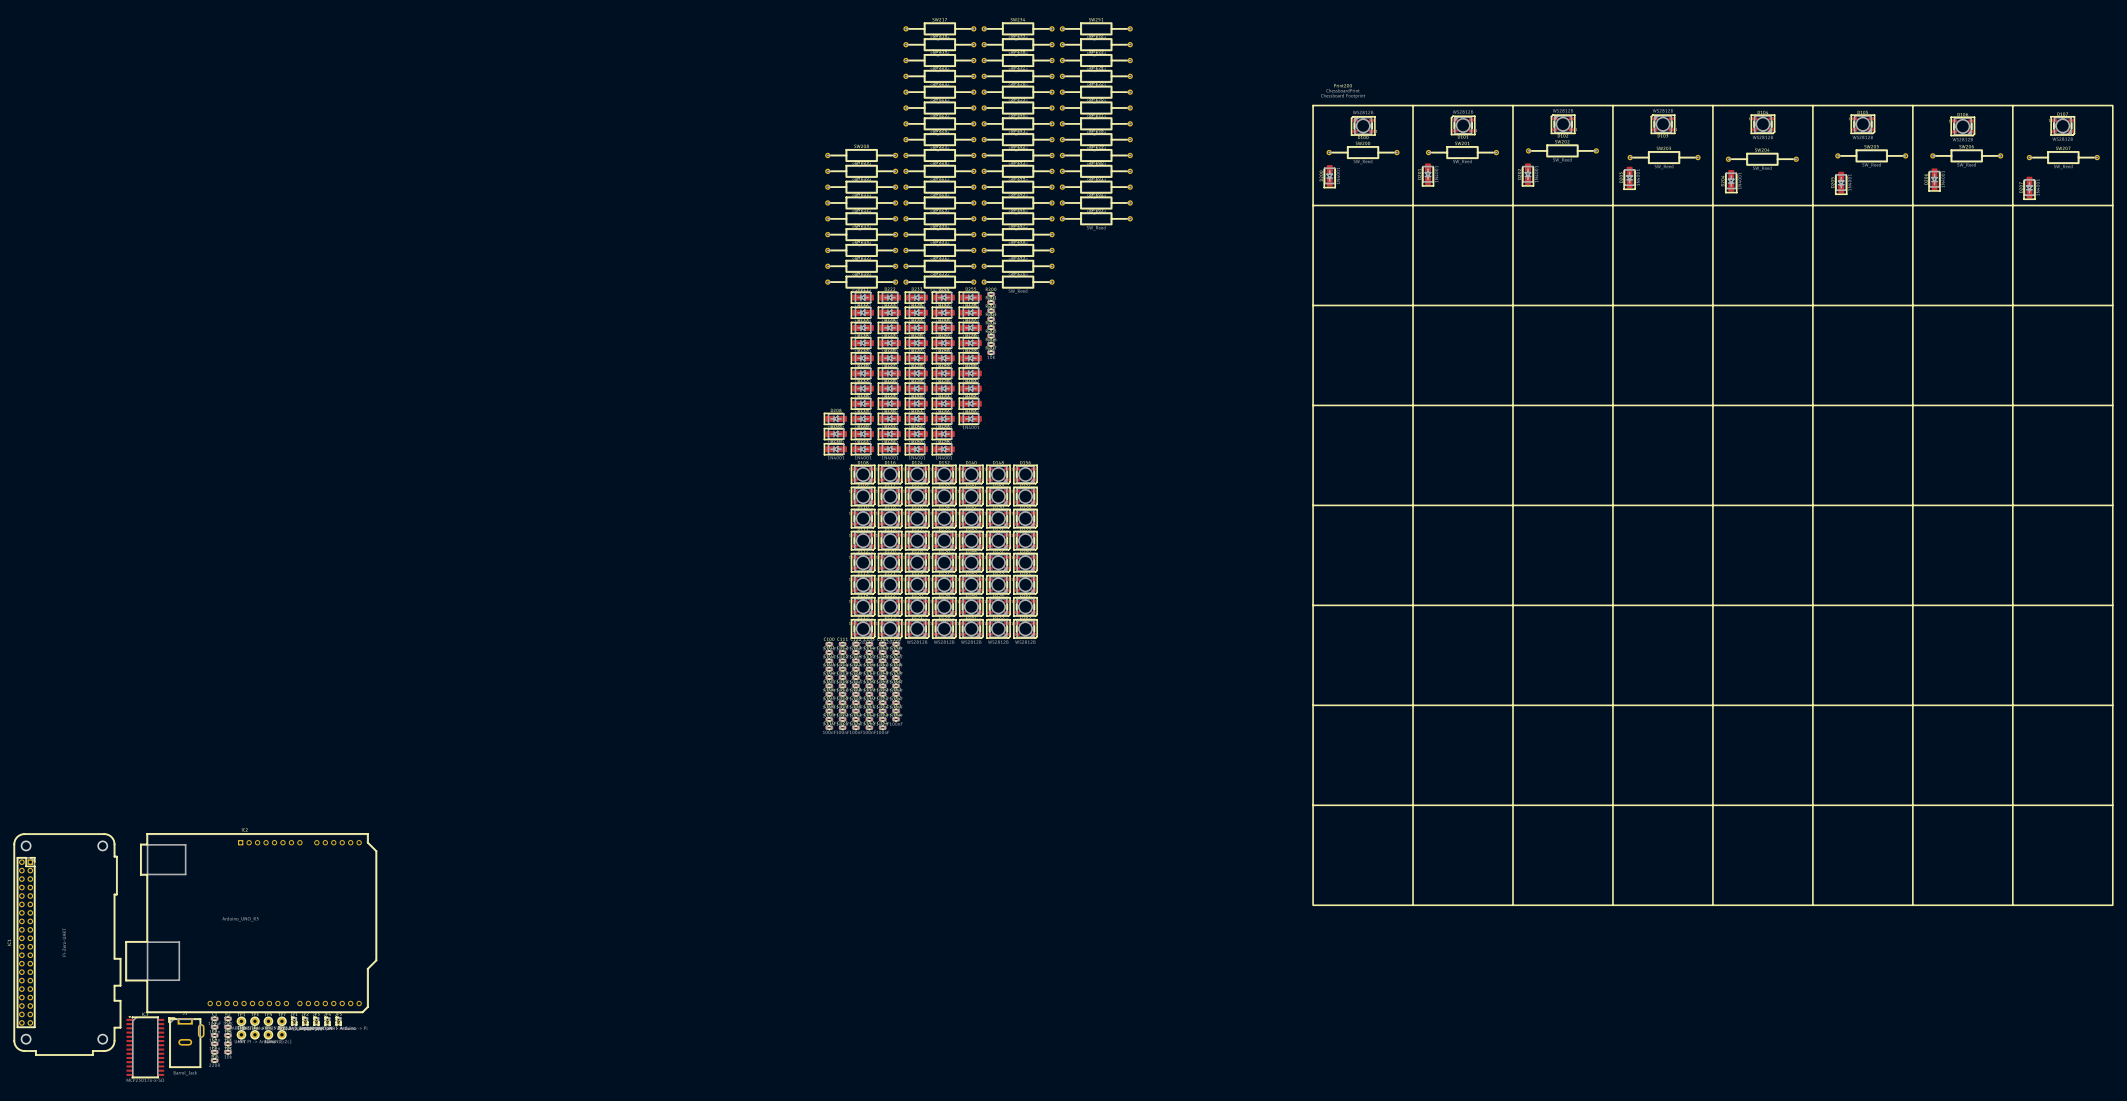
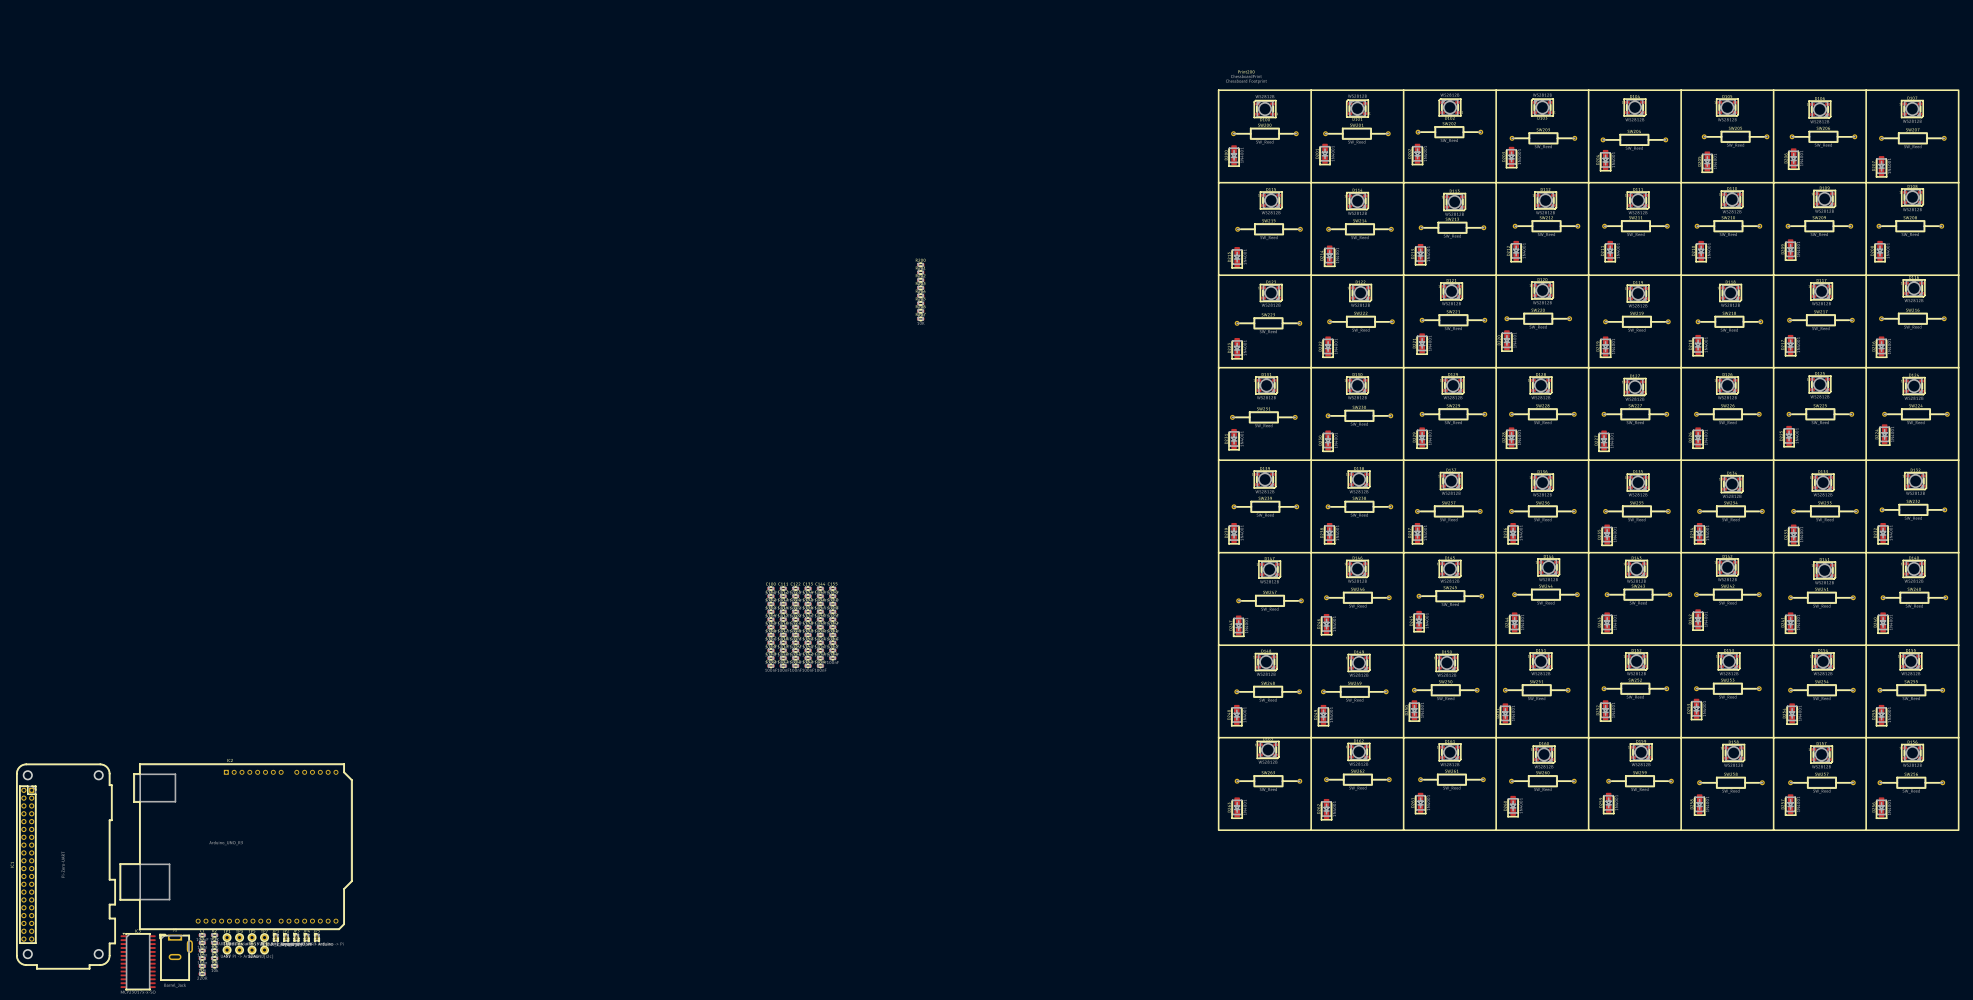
part position: (939, 28) -> (1820, 320)
part position: (1018, 28) -> (1730, 511)
part position: (1096, 28) -> (1536, 690)
part position: (939, 44) -> (1729, 321)
part position: (1018, 44) -> (1636, 511)
part position: (1096, 44) -> (1635, 688)
part position: (939, 60) -> (1636, 321)
part position: (1018, 60) -> (1542, 511)
part position: (1096, 60) -> (1727, 688)
part position: (939, 76) -> (1538, 318)
part position: (1018, 76) -> (1448, 511)
part position: (1096, 76) -> (1821, 690)
part position: (939, 92) -> (1453, 320)
part position: (1018, 92) -> (1359, 506)
part position: (1096, 92) -> (1911, 690)
part position: (939, 108) -> (1360, 321)
part position: (1018, 108) -> (1265, 506)
part position: (1096, 108) -> (1911, 782)
part position: (939, 123) -> (1268, 323)
part position: (1018, 123) -> (1914, 597)
part position: (1096, 123) -> (1821, 782)
part position: (939, 139) -> (1915, 414)
part position: (1018, 139) -> (1821, 597)
part position: (1096, 139) -> (1730, 782)
part position: (861, 155) -> (1910, 226)
part position: (939, 155) -> (1820, 414)
part position: (1018, 155) -> (1727, 594)
part position: (1096, 155) -> (1640, 781)
part position: (861, 171) -> (1819, 226)
part position: (939, 171) -> (1727, 414)
part position: (1018, 171) -> (1638, 594)
part position: (1096, 171) -> (1542, 781)
part position: (861, 187) -> (1728, 226)
part position: (939, 187) -> (1635, 414)
part position: (1018, 187) -> (1545, 594)
part position: (1096, 187) -> (1451, 779)
part position: (861, 202) -> (1635, 226)
part position: (939, 202) -> (1542, 414)
part position: (1018, 202) -> (1450, 596)
part position: (1096, 202) -> (1357, 779)
part position: (861, 218) -> (1546, 226)
part position: (939, 218) -> (1453, 414)
part position: (1018, 218) -> (1357, 597)
part position: (1096, 218) -> (1268, 781)
part position: (861, 234) -> (1452, 227)
part position: (939, 234) -> (1359, 415)
part position: (1018, 234) -> (1270, 600)
part position: (861, 250) -> (1359, 229)
part position: (939, 250) -> (1263, 417)
part position: (1018, 250) -> (1268, 691)
part position: (861, 266) -> (1269, 229)
part position: (939, 266) -> (1913, 509)
part position: (1018, 266) -> (1354, 691)
part position: (861, 282) -> (1912, 318)
part position: (939, 282) -> (1825, 511)
part position: (1018, 282) -> (1445, 690)
part rotation: 0° (862, 297) -> 90° counterclockwise (1610, 251)
part position: (862, 297) -> (1610, 251)
part rotation: 0° (889, 297) -> 90° counterclockwise (1328, 346)
part position: (889, 297) -> (1328, 346)
part rotation: 0° (916, 297) -> 90° counterclockwise (1793, 535)
part position: (916, 297) -> (1793, 535)
part rotation: 0° (943, 297) -> 90° counterclockwise (1514, 622)
part position: (943, 297) -> (1514, 622)
part rotation: 0° (970, 297) -> 90° counterclockwise (1881, 715)
part position: (970, 297) -> (1881, 715)
part rotation: 0° (862, 312) -> 90° counterclockwise (1516, 251)
part position: (862, 312) -> (1516, 251)
part rotation: 0° (889, 312) -> 90° counterclockwise (1237, 348)
part position: (889, 312) -> (1237, 348)
part rotation: 0° (916, 312) -> 90° counterclockwise (1699, 533)
part position: (916, 312) -> (1699, 533)
part rotation: 0° (943, 312) -> 90° counterclockwise (1419, 621)
part position: (943, 312) -> (1419, 621)
part rotation: 0° (970, 312) -> 90° counterclockwise (1881, 807)
part position: (970, 312) -> (1881, 807)
part rotation: 0° (862, 327) -> 90° counterclockwise (1420, 254)
part position: (862, 327) -> (1420, 254)
part rotation: 0° (889, 327) -> 90° counterclockwise (1884, 434)
part position: (889, 327) -> (1884, 434)
part rotation: 0° (916, 327) -> 90° counterclockwise (1607, 535)
part position: (916, 327) -> (1607, 535)
part rotation: 0° (943, 327) -> 90° counterclockwise (1326, 624)
part position: (943, 327) -> (1326, 624)
part rotation: 0° (970, 327) -> 90° counterclockwise (1790, 804)
part position: (970, 327) -> (1790, 804)
part rotation: 0° (862, 343) -> 90° counterclockwise (1329, 256)
part position: (862, 343) -> (1329, 256)
part rotation: 0° (889, 343) -> 90° counterclockwise (1789, 436)
part position: (889, 343) -> (1789, 436)
part rotation: 0° (916, 343) -> 90° counterclockwise (1513, 533)
part position: (916, 343) -> (1513, 533)
part rotation: 0° (943, 343) -> 90° counterclockwise (1238, 626)
part position: (943, 343) -> (1238, 626)
part rotation: 0° (970, 343) -> 90° counterclockwise (1699, 804)
part position: (970, 343) -> (1699, 804)
part rotation: 0° (862, 358) -> 90° counterclockwise (1237, 257)
part position: (862, 358) -> (1237, 257)
part rotation: 0° (889, 358) -> 90° counterclockwise (1698, 437)
part position: (889, 358) -> (1698, 437)
part rotation: 0° (916, 358) -> 90° counterclockwise (1417, 533)
part position: (916, 358) -> (1417, 533)
part rotation: 0° (943, 358) -> 90° counterclockwise (1236, 715)
part position: (943, 358) -> (1236, 715)
part rotation: 0° (970, 358) -> 90° counterclockwise (1608, 803)
part position: (970, 358) -> (1608, 803)
part rotation: 0° (862, 373) -> 90° counterclockwise (1881, 346)
part position: (862, 373) -> (1881, 346)
part rotation: 0° (889, 373) -> 90° counterclockwise (1604, 441)
part position: (889, 373) -> (1604, 441)
part rotation: 0° (916, 373) -> 90° counterclockwise (1329, 533)
part position: (916, 373) -> (1329, 533)
part rotation: 0° (943, 373) -> 90° counterclockwise (1323, 715)
part position: (943, 373) -> (1323, 715)
part rotation: 0° (970, 373) -> 90° counterclockwise (1513, 806)
part position: (970, 373) -> (1513, 806)
part rotation: 0° (862, 388) -> 90° counterclockwise (1790, 345)
part position: (862, 388) -> (1790, 345)
part rotation: 0° (889, 388) -> 90° counterclockwise (1511, 437)
part position: (889, 388) -> (1511, 437)
part rotation: 0° (916, 388) -> 90° counterclockwise (1234, 533)
part position: (916, 388) -> (1234, 533)
part rotation: 0° (943, 388) -> 90° counterclockwise (1414, 710)
part position: (943, 388) -> (1414, 710)
part rotation: 0° (970, 388) -> 90° counterclockwise (1420, 803)
part position: (970, 388) -> (1420, 803)
part rotation: 0° (862, 403) -> 90° counterclockwise (1698, 345)
part position: (862, 403) -> (1698, 345)
part rotation: 0° (889, 403) -> 90° counterclockwise (1422, 437)
part position: (889, 403) -> (1422, 437)
part rotation: 0° (916, 403) -> 90° counterclockwise (1883, 622)
part position: (916, 403) -> (1883, 622)
part rotation: 0° (943, 403) -> 90° counterclockwise (1505, 713)
part position: (943, 403) -> (1505, 713)
part rotation: 0° (970, 403) -> 90° counterclockwise (1326, 809)
part position: (970, 403) -> (1326, 809)
part rotation: 0° (835, 418) -> 90° counterclockwise (1880, 251)
part position: (835, 418) -> (1880, 251)
part rotation: 0° (862, 418) -> 90° counterclockwise (1605, 346)
part position: (862, 418) -> (1605, 346)
part rotation: 0° (889, 418) -> 90° counterclockwise (1328, 441)
part position: (889, 418) -> (1328, 441)
part rotation: 0° (916, 418) -> 90° counterclockwise (1790, 622)
part position: (916, 418) -> (1790, 622)
part rotation: 0° (943, 418) -> 90° counterclockwise (1605, 710)
part position: (943, 418) -> (1605, 710)
part rotation: 0° (970, 418) -> 90° counterclockwise (1237, 807)
part position: (970, 418) -> (1237, 807)
part rotation: 0° (835, 434) -> 90° counterclockwise (1790, 249)
part position: (835, 434) -> (1790, 249)
part rotation: 0° (862, 434) -> 90° counterclockwise (1506, 340)
part position: (862, 434) -> (1506, 340)
part rotation: 0° (889, 434) -> 90° counterclockwise (1234, 439)
part position: (889, 434) -> (1234, 439)
part rotation: 0° (916, 434) -> 90° counterclockwise (1698, 619)
part position: (916, 434) -> (1698, 619)
part rotation: 0° (943, 434) -> 90° counterclockwise (1696, 709)
part position: (943, 434) -> (1696, 709)
part rotation: 0° (835, 449) -> 90° counterclockwise (1701, 251)
part position: (835, 449) -> (1701, 251)
part rotation: 0° (862, 449) -> 90° counterclockwise (1422, 343)
part position: (862, 449) -> (1422, 343)
part rotation: 0° (889, 449) -> 90° counterclockwise (1883, 533)
part position: (889, 449) -> (1883, 533)
part rotation: 0° (916, 449) -> 90° counterclockwise (1607, 622)
part position: (916, 449) -> (1607, 622)
part rotation: 0° (943, 449) -> 90° counterclockwise (1792, 713)
part position: (943, 449) -> (1792, 713)
part position: (863, 474) -> (1912, 197)
part position: (890, 474) -> (1914, 288)
part position: (917, 474) -> (1914, 386)
part position: (944, 474) -> (1915, 481)
part position: (971, 474) -> (1914, 568)
part position: (998, 474) -> (1266, 662)
part position: (1025, 474) -> (1912, 753)
part position: (863, 496) -> (1824, 198)
part position: (890, 496) -> (1821, 291)
part position: (917, 496) -> (1820, 384)
part position: (944, 496) -> (1823, 482)
part position: (971, 496) -> (1824, 570)
part position: (998, 496) -> (1359, 662)
part position: (1025, 496) -> (1821, 754)
part position: (863, 518) -> (1732, 199)
part position: (890, 518) -> (1730, 292)
part position: (917, 518) -> (1727, 385)
part position: (944, 518) -> (1732, 484)
part position: (971, 518) -> (1727, 567)
part position: (998, 518) -> (1446, 662)
part position: (1025, 518) -> (1733, 753)
part position: (863, 540) -> (1638, 200)
part position: (890, 540) -> (1638, 293)
part position: (917, 540) -> (1635, 387)
part position: (944, 540) -> (1638, 482)
part position: (971, 540) -> (1636, 568)
part position: (998, 540) -> (1541, 661)
part position: (1025, 540) -> (1641, 752)
part position: (863, 562) -> (1545, 200)
part position: (890, 562) -> (1542, 290)
part position: (917, 562) -> (1541, 385)
part position: (944, 562) -> (1542, 482)
part position: (971, 562) -> (1548, 567)
part position: (998, 562) -> (1636, 661)
part position: (1025, 562) -> (1544, 754)
part position: (863, 584) -> (1454, 202)
part position: (890, 584) -> (1451, 291)
part position: (917, 584) -> (1453, 385)
part position: (944, 584) -> (1451, 481)
part position: (971, 584) -> (1450, 568)
part position: (998, 584) -> (1729, 661)
part position: (1025, 584) -> (1450, 752)
part position: (863, 606) -> (1357, 201)
part position: (890, 606) -> (1360, 292)
part position: (917, 606) -> (1357, 385)
part position: (944, 606) -> (1359, 479)
part position: (971, 606) -> (1357, 568)
part position: (998, 606) -> (1823, 661)
part position: (1025, 606) -> (1358, 751)
part position: (863, 628) -> (1271, 200)
part position: (890, 628) -> (1271, 292)
part position: (917, 628) -> (1266, 385)
part position: (944, 628) -> (1265, 479)
part position: (971, 628) -> (1269, 569)
part position: (998, 628) -> (1911, 661)
part position: (1025, 628) -> (1268, 749)

